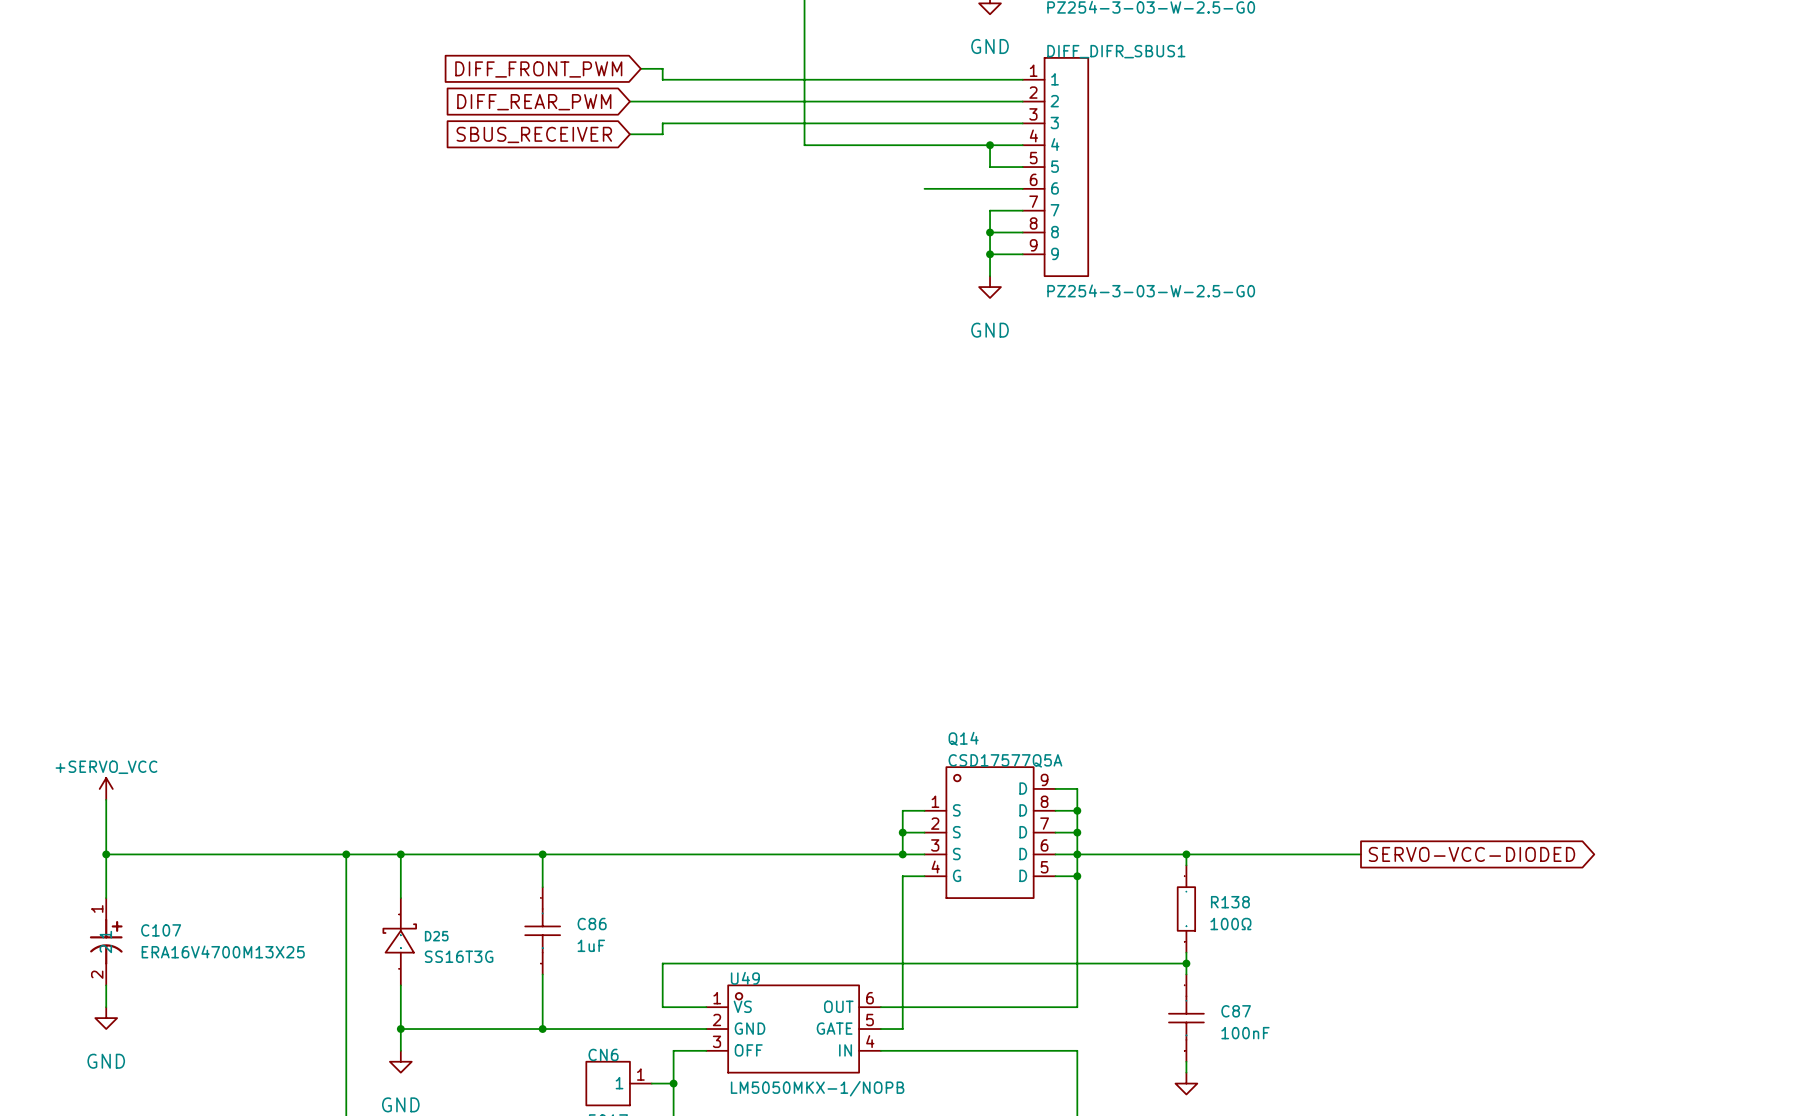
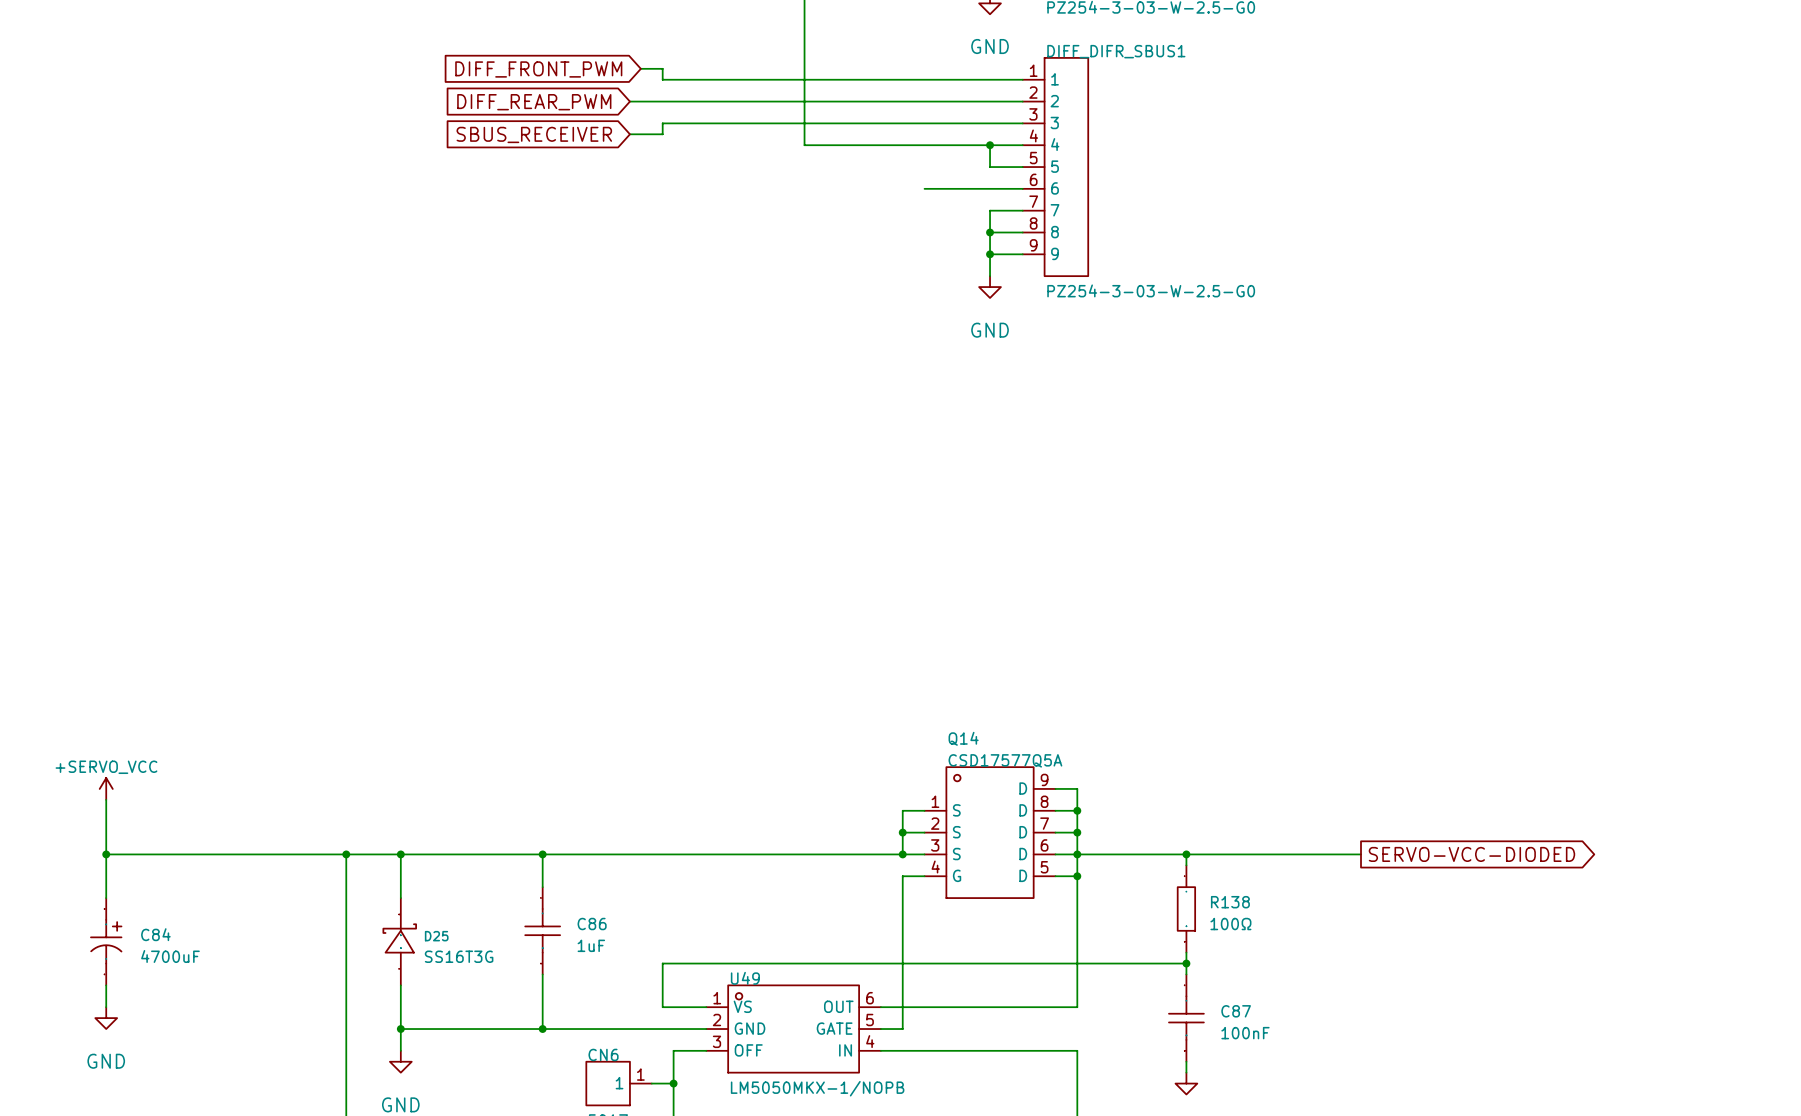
C107: ERA16V4700M13X25 (106, 941) -> none
C84: none -> 4700uF (106, 941)

